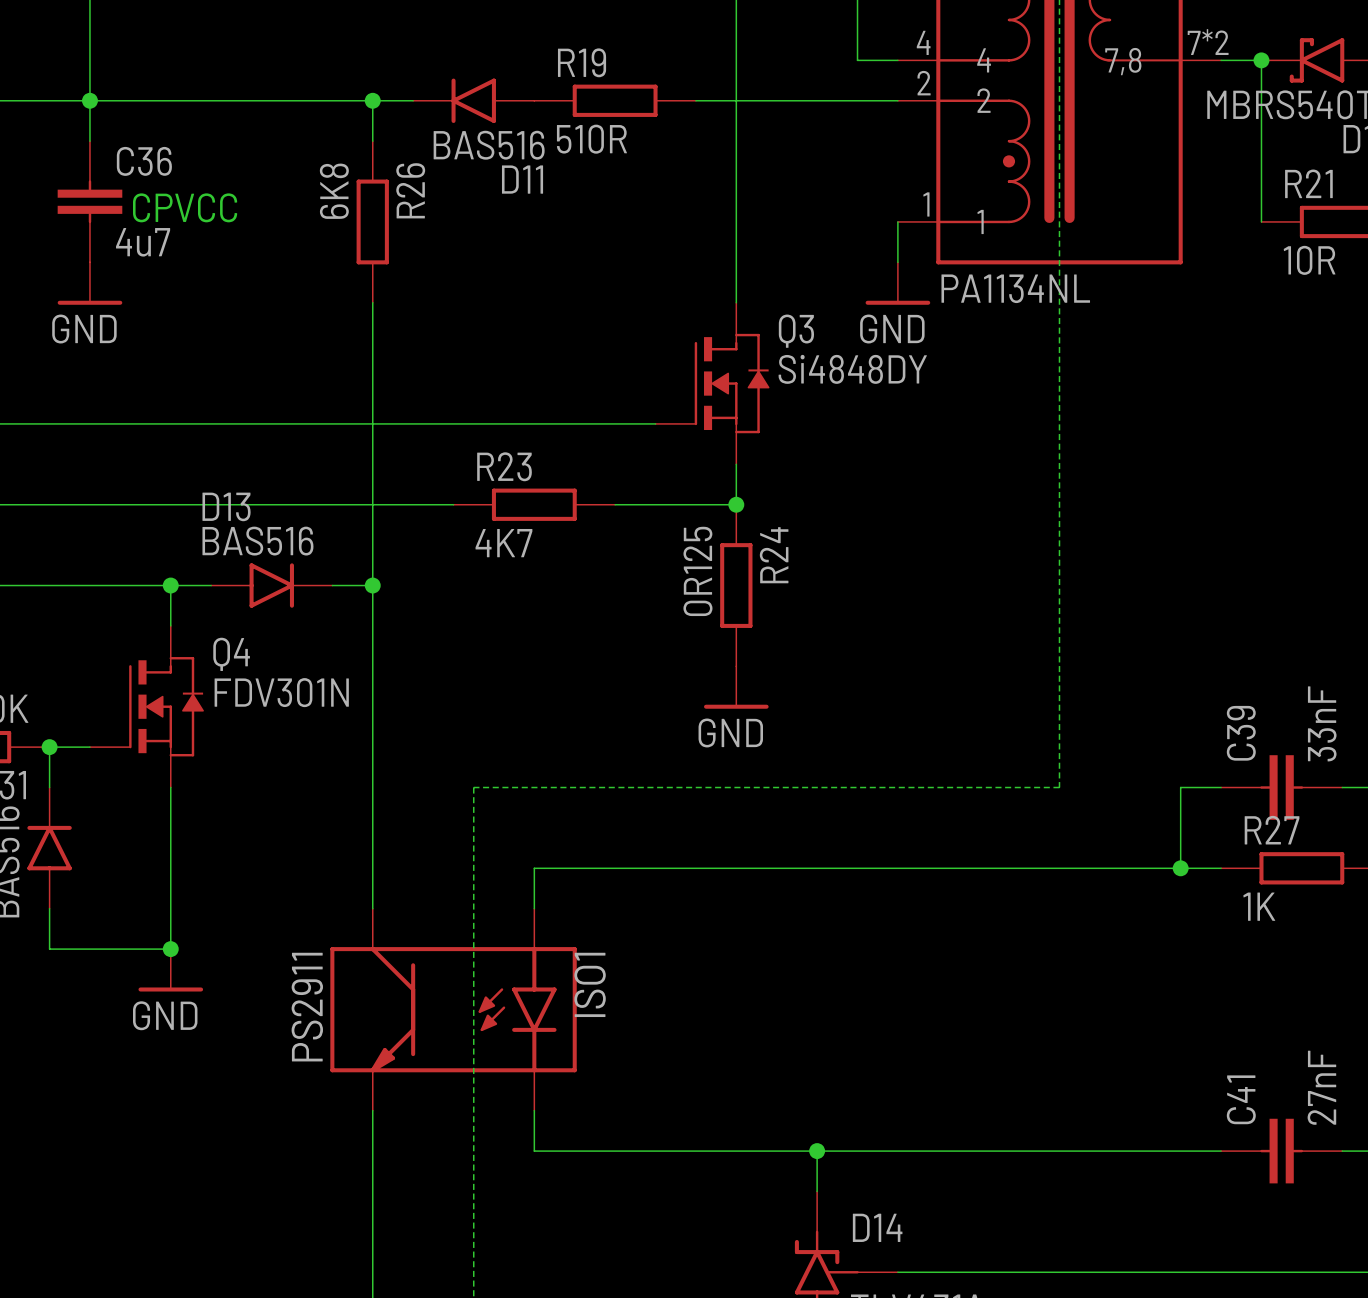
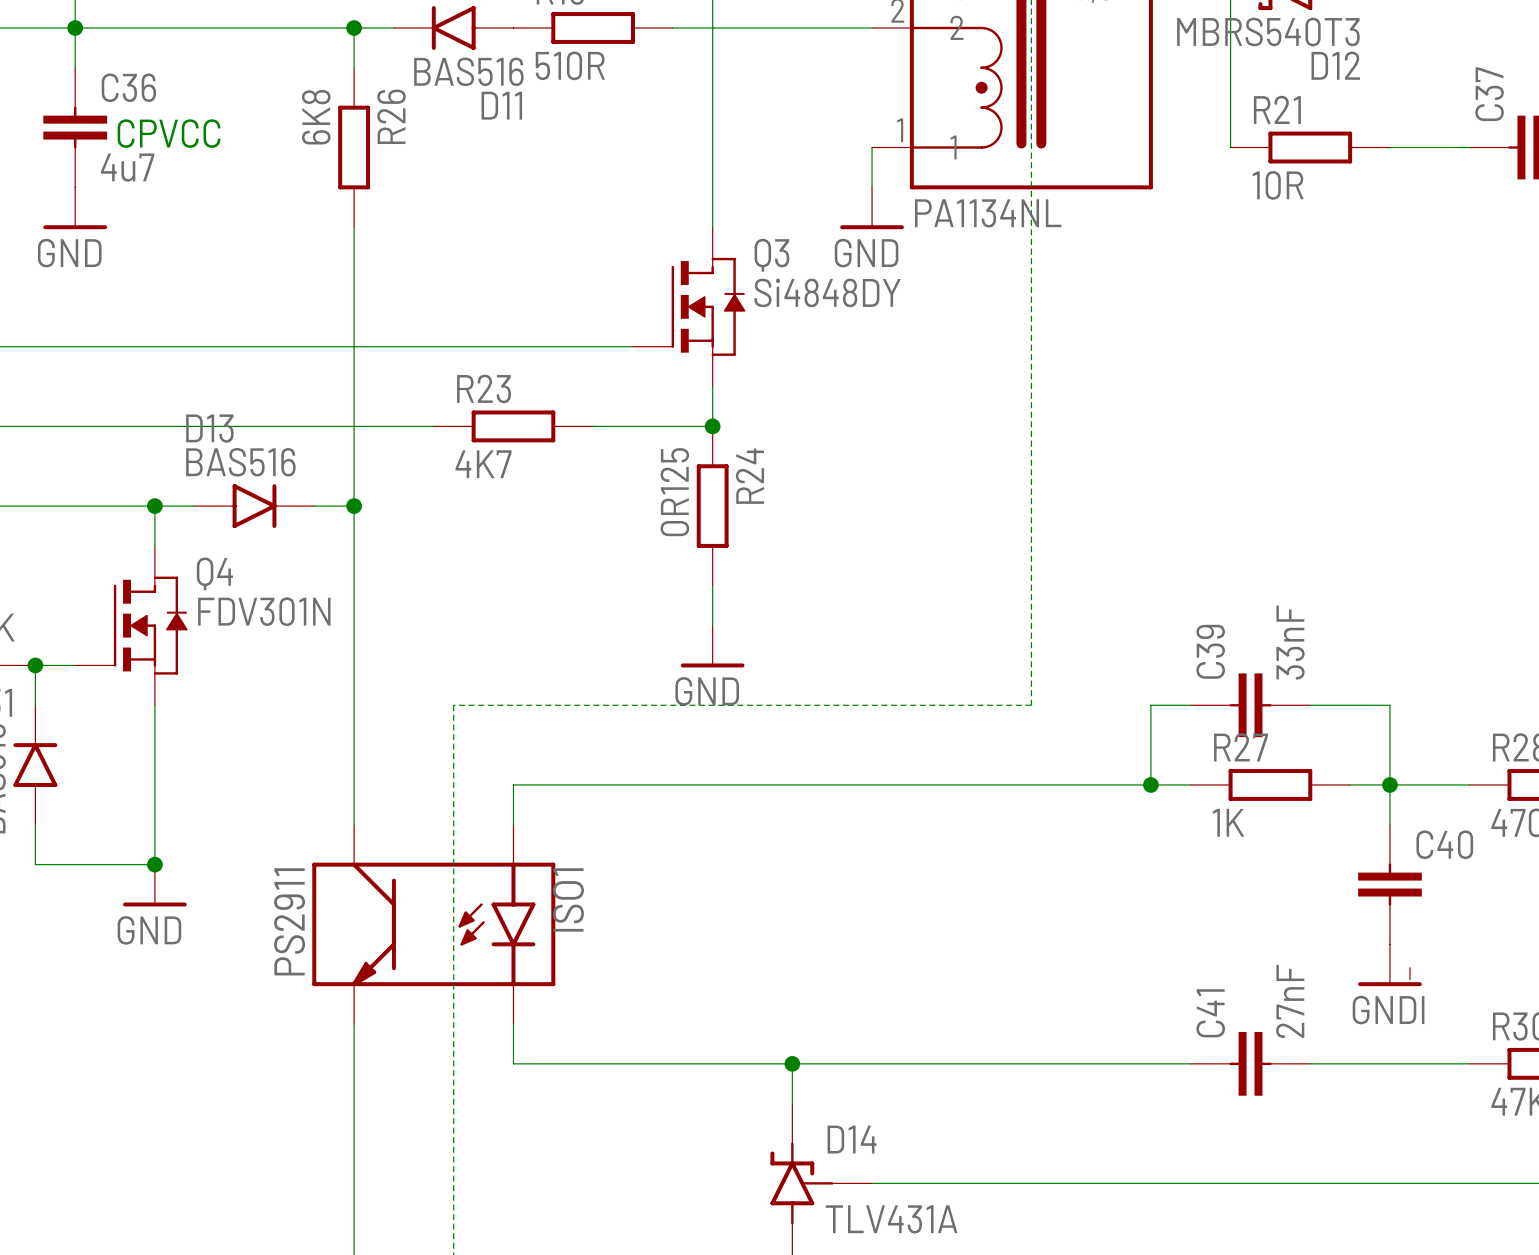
power symbol position: GND (736, 687) -> GND (712, 646)

